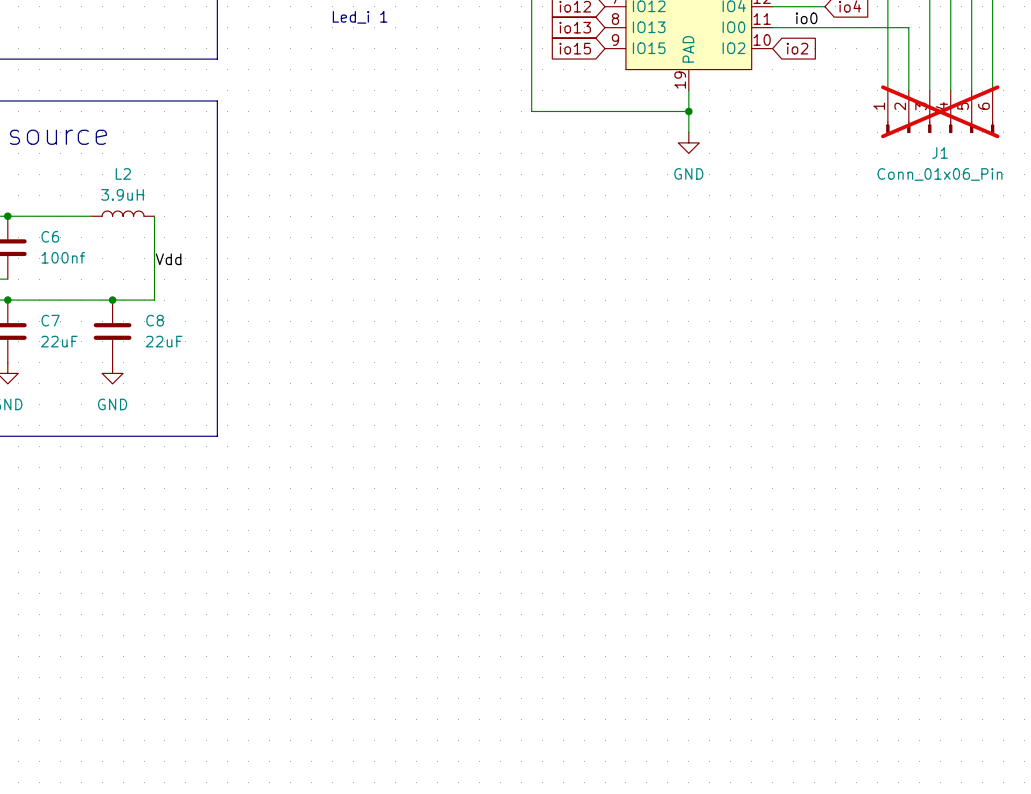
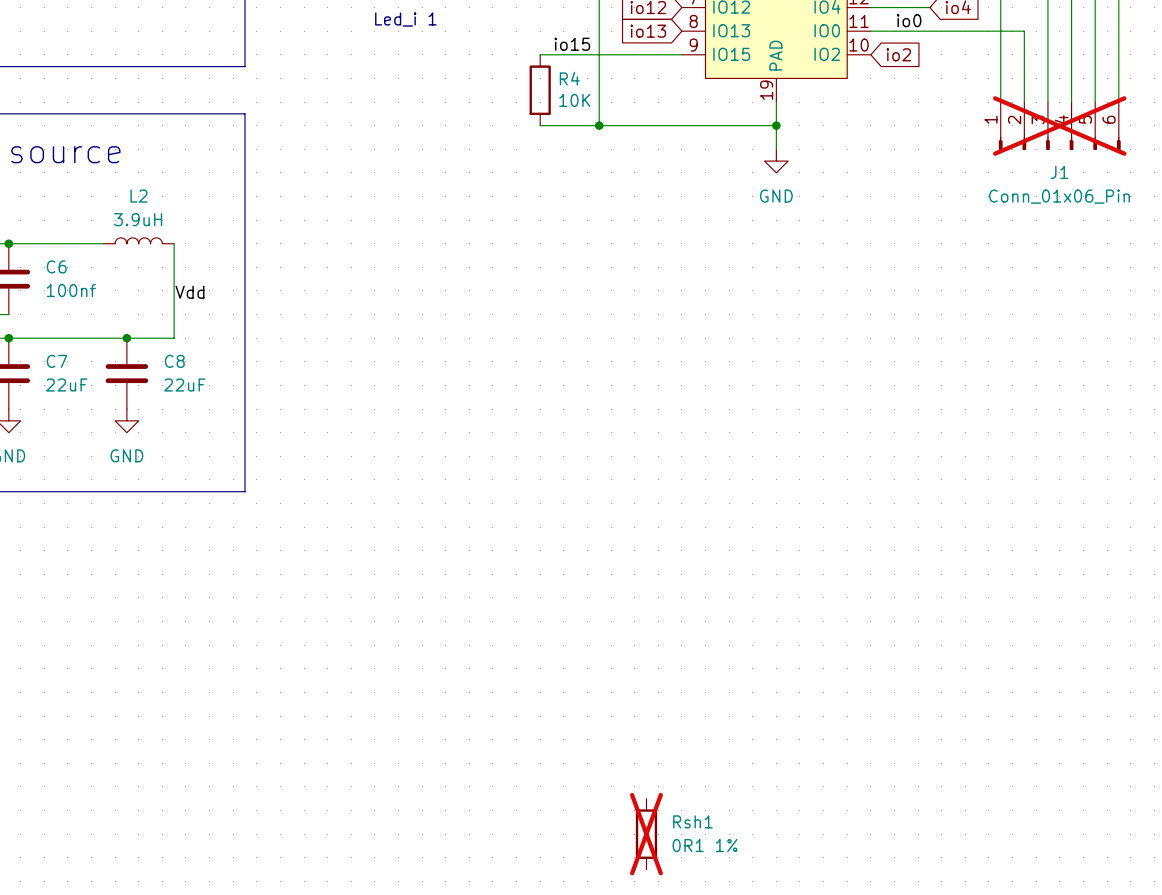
label: none -> io15 (572, 44)
wire: none -> (540, 54) (681, 54)
global label: io15 (575, 48) -> none
R4: none -> 10K (540, 90)
wire: none -> (540, 125) (599, 125)
junction: none -> (599, 125)
Rsh1: none -> 0R1 1% (646, 834)

